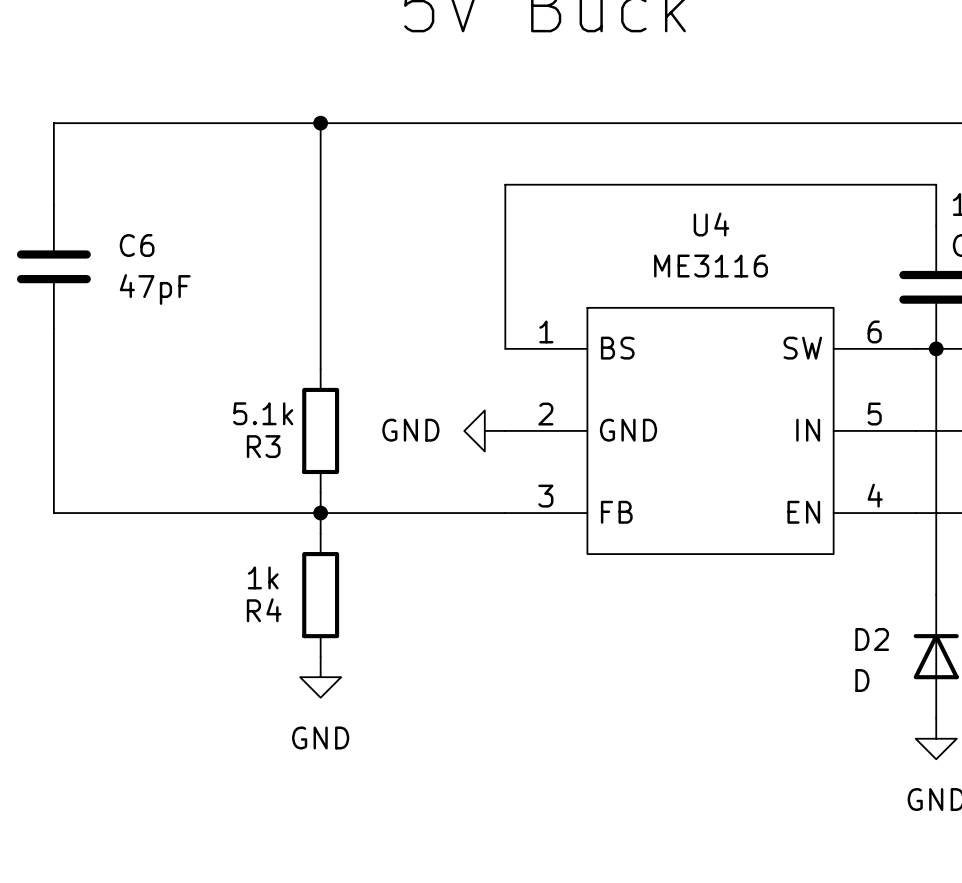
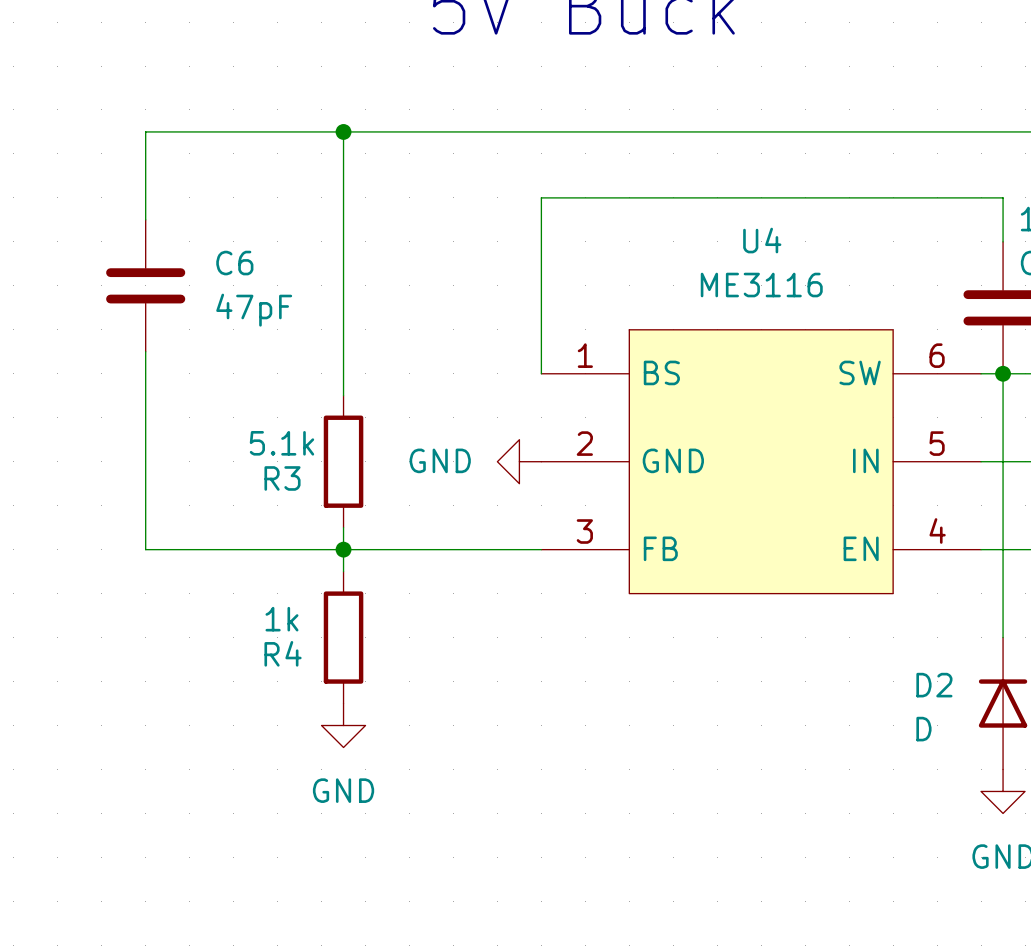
wire: (135, 123) (53, 123) (53, 205) -> (145, 131) (145, 219)
C6 position: (53, 266) -> (145, 285)
wire: (53, 328) (53, 513) (135, 513) -> (145, 351) (145, 549)

